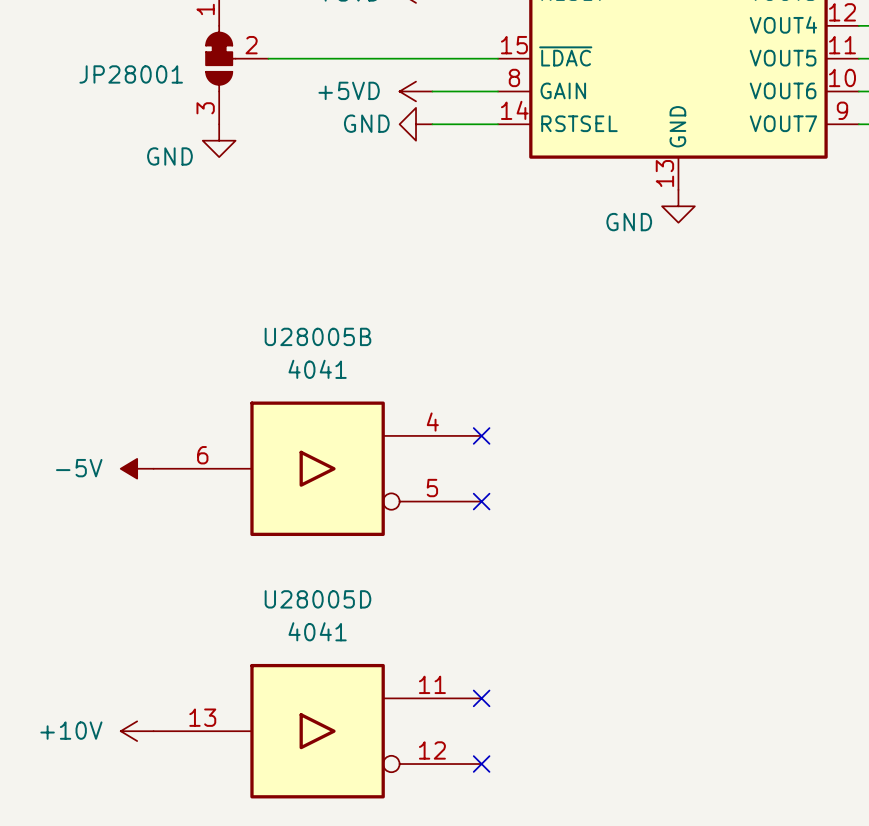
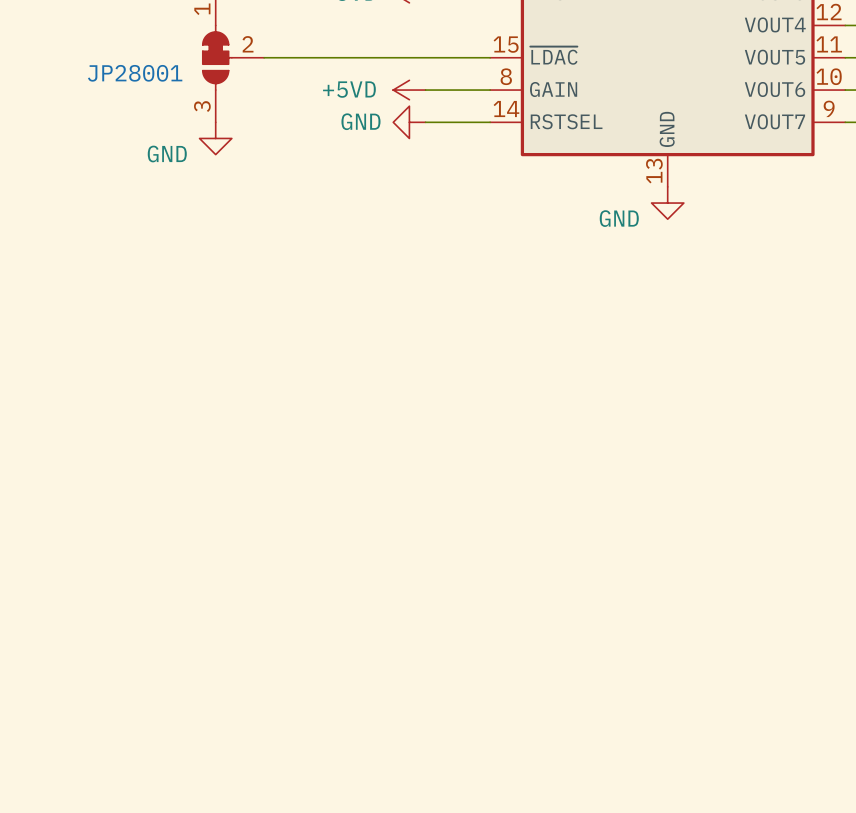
no-connect mark: (481, 435) -> none
power symbol: -5V (137, 468) -> none
U28005B: 4041 (317, 468) -> none
no-connect mark: (481, 501) -> none
no-connect mark: (481, 698) -> none
power symbol: +10V (137, 731) -> none
U28005D: 4041 (317, 731) -> none
no-connect mark: (481, 764) -> none

